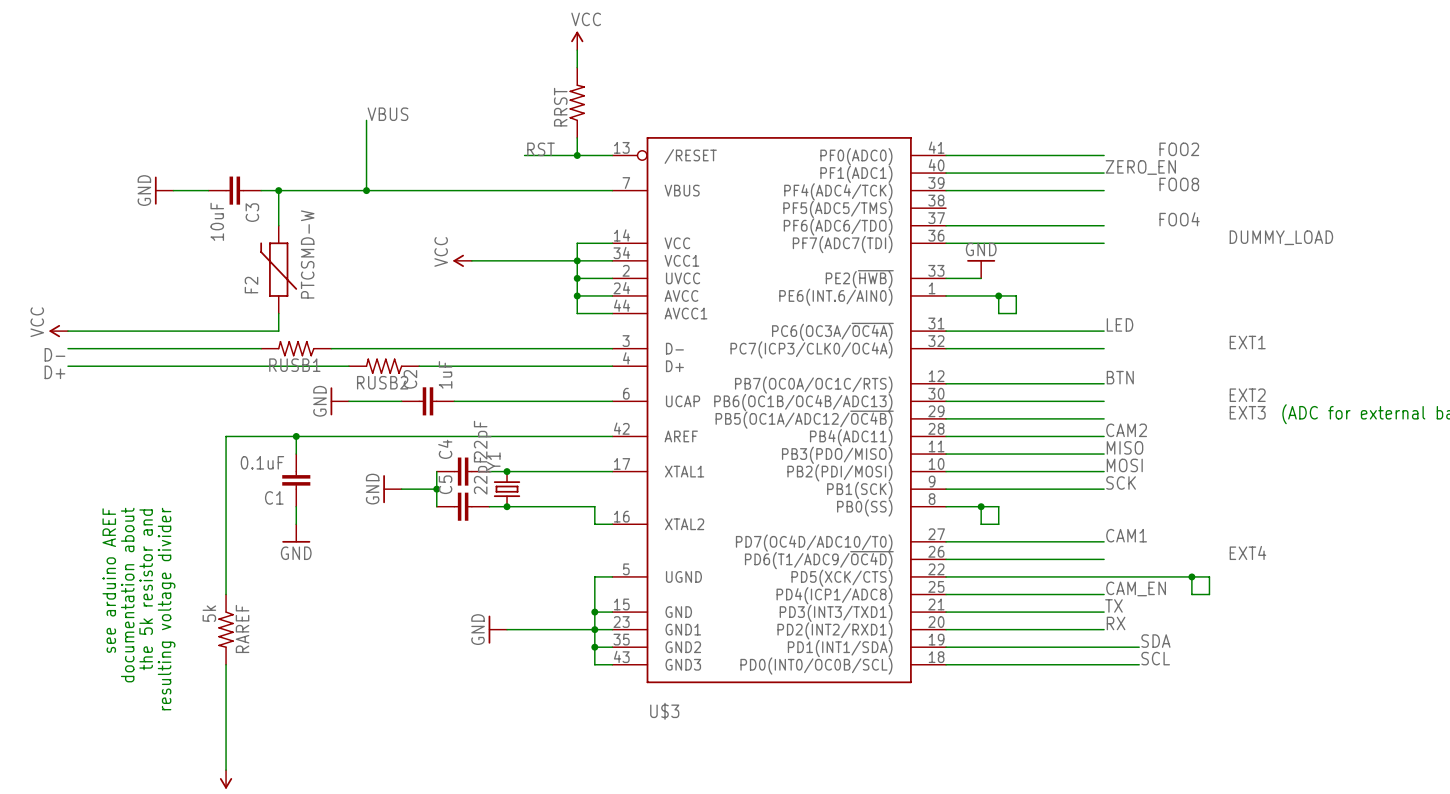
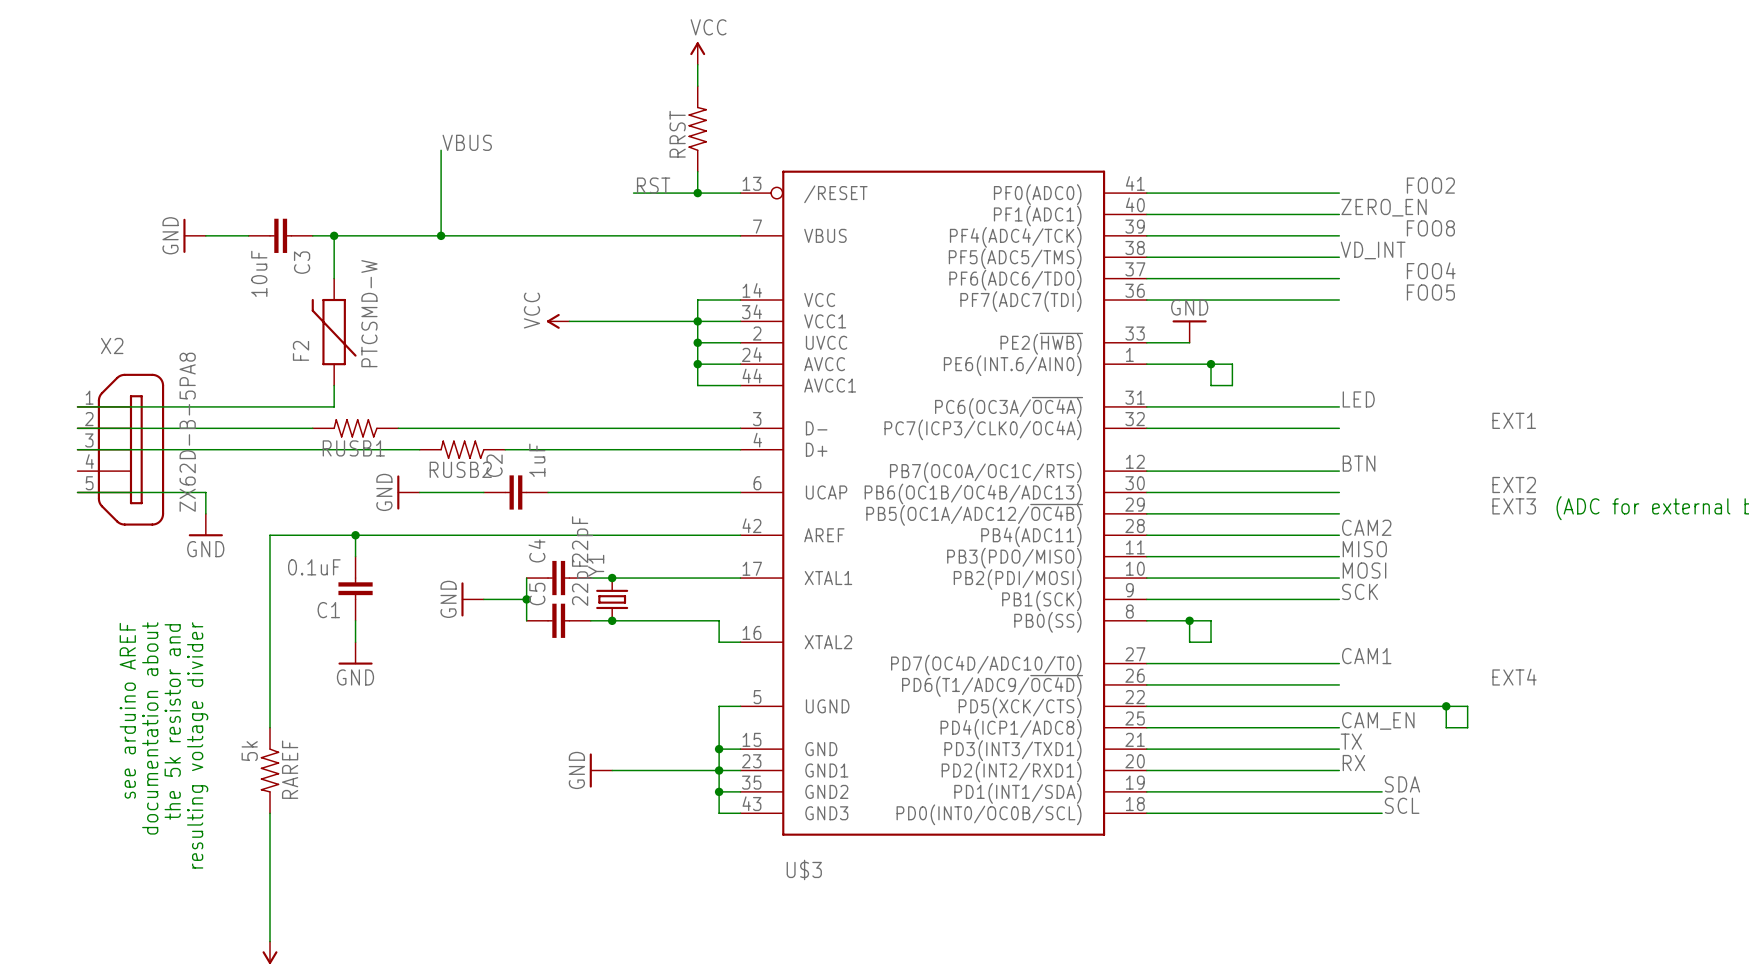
label: none -> VD_INT (1373, 250)
wire: none -> (1146, 257) (1339, 257)
label: none -> FOO5 (1430, 292)
label: DUMMY_LOAD (1281, 237) -> none
power symbol: VCC (58, 331) -> none
label: D- (54, 354) -> none
X2: none -> ZX62D-B-5PA8 (120, 449)
label: D+ (54, 372) -> none
wire: none -> (77, 492) (205, 492) (205, 513)
power symbol: none -> GND (205, 525)

